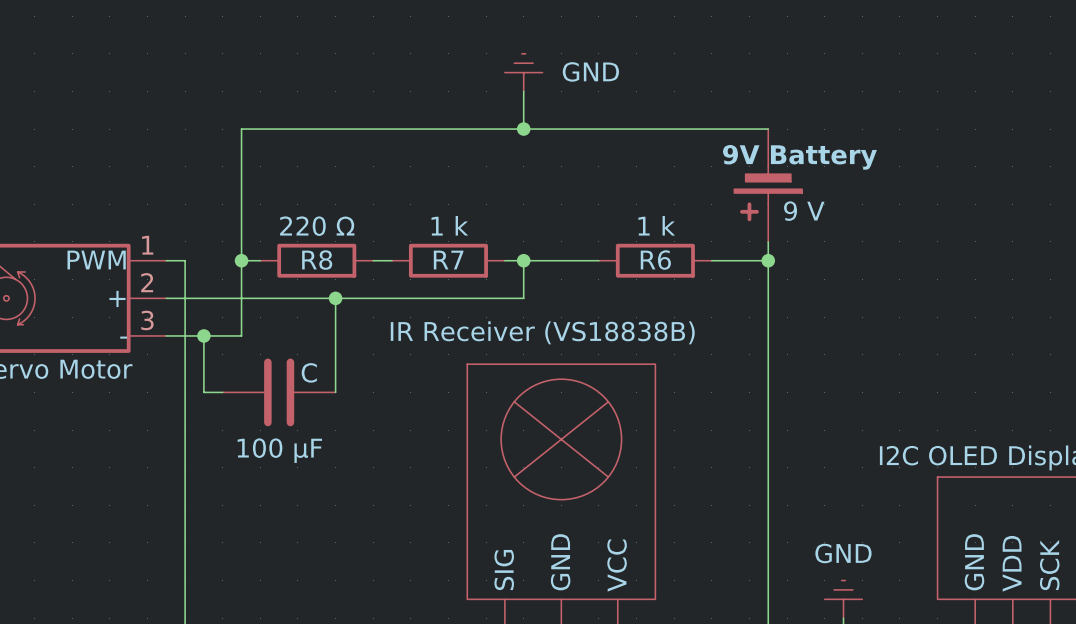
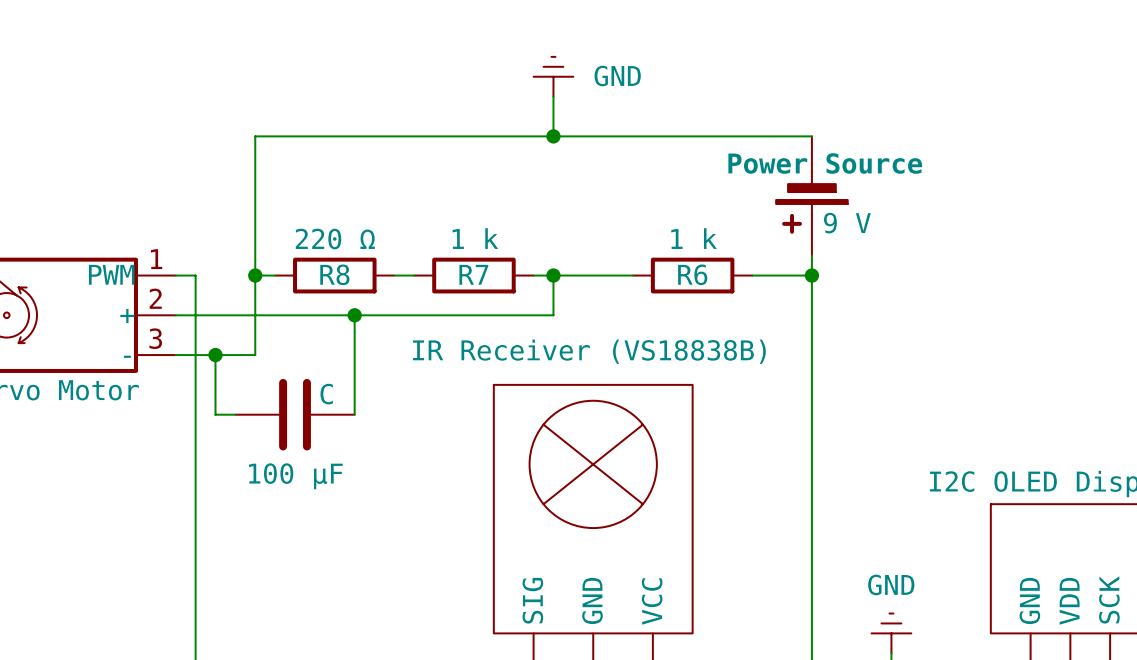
part text: 9V Battery (799, 157) -> Power Source (825, 163)

